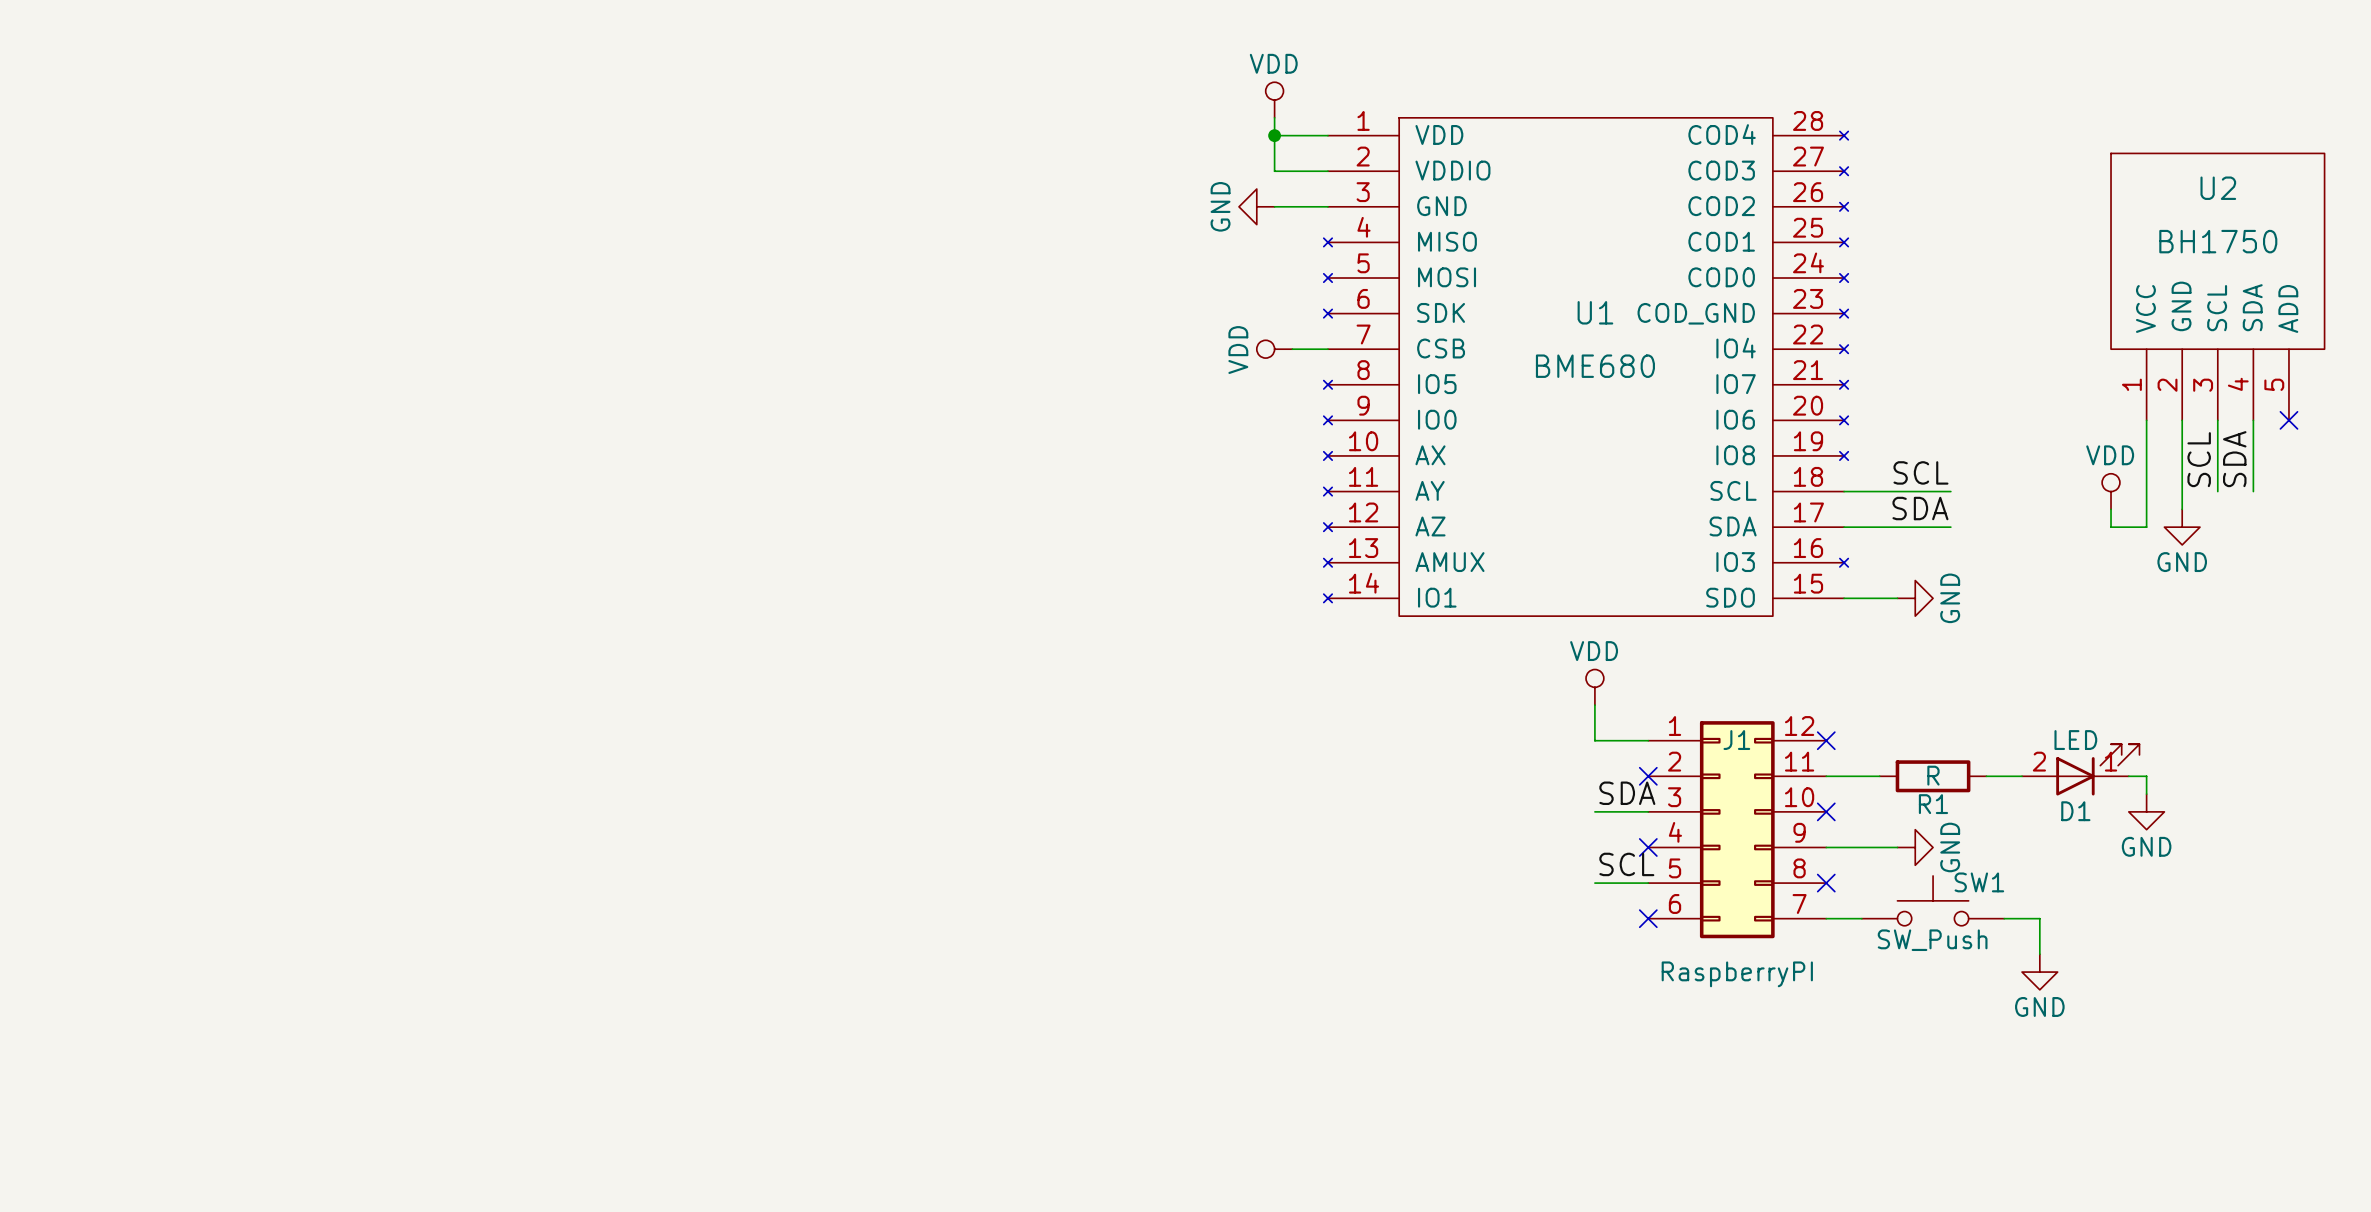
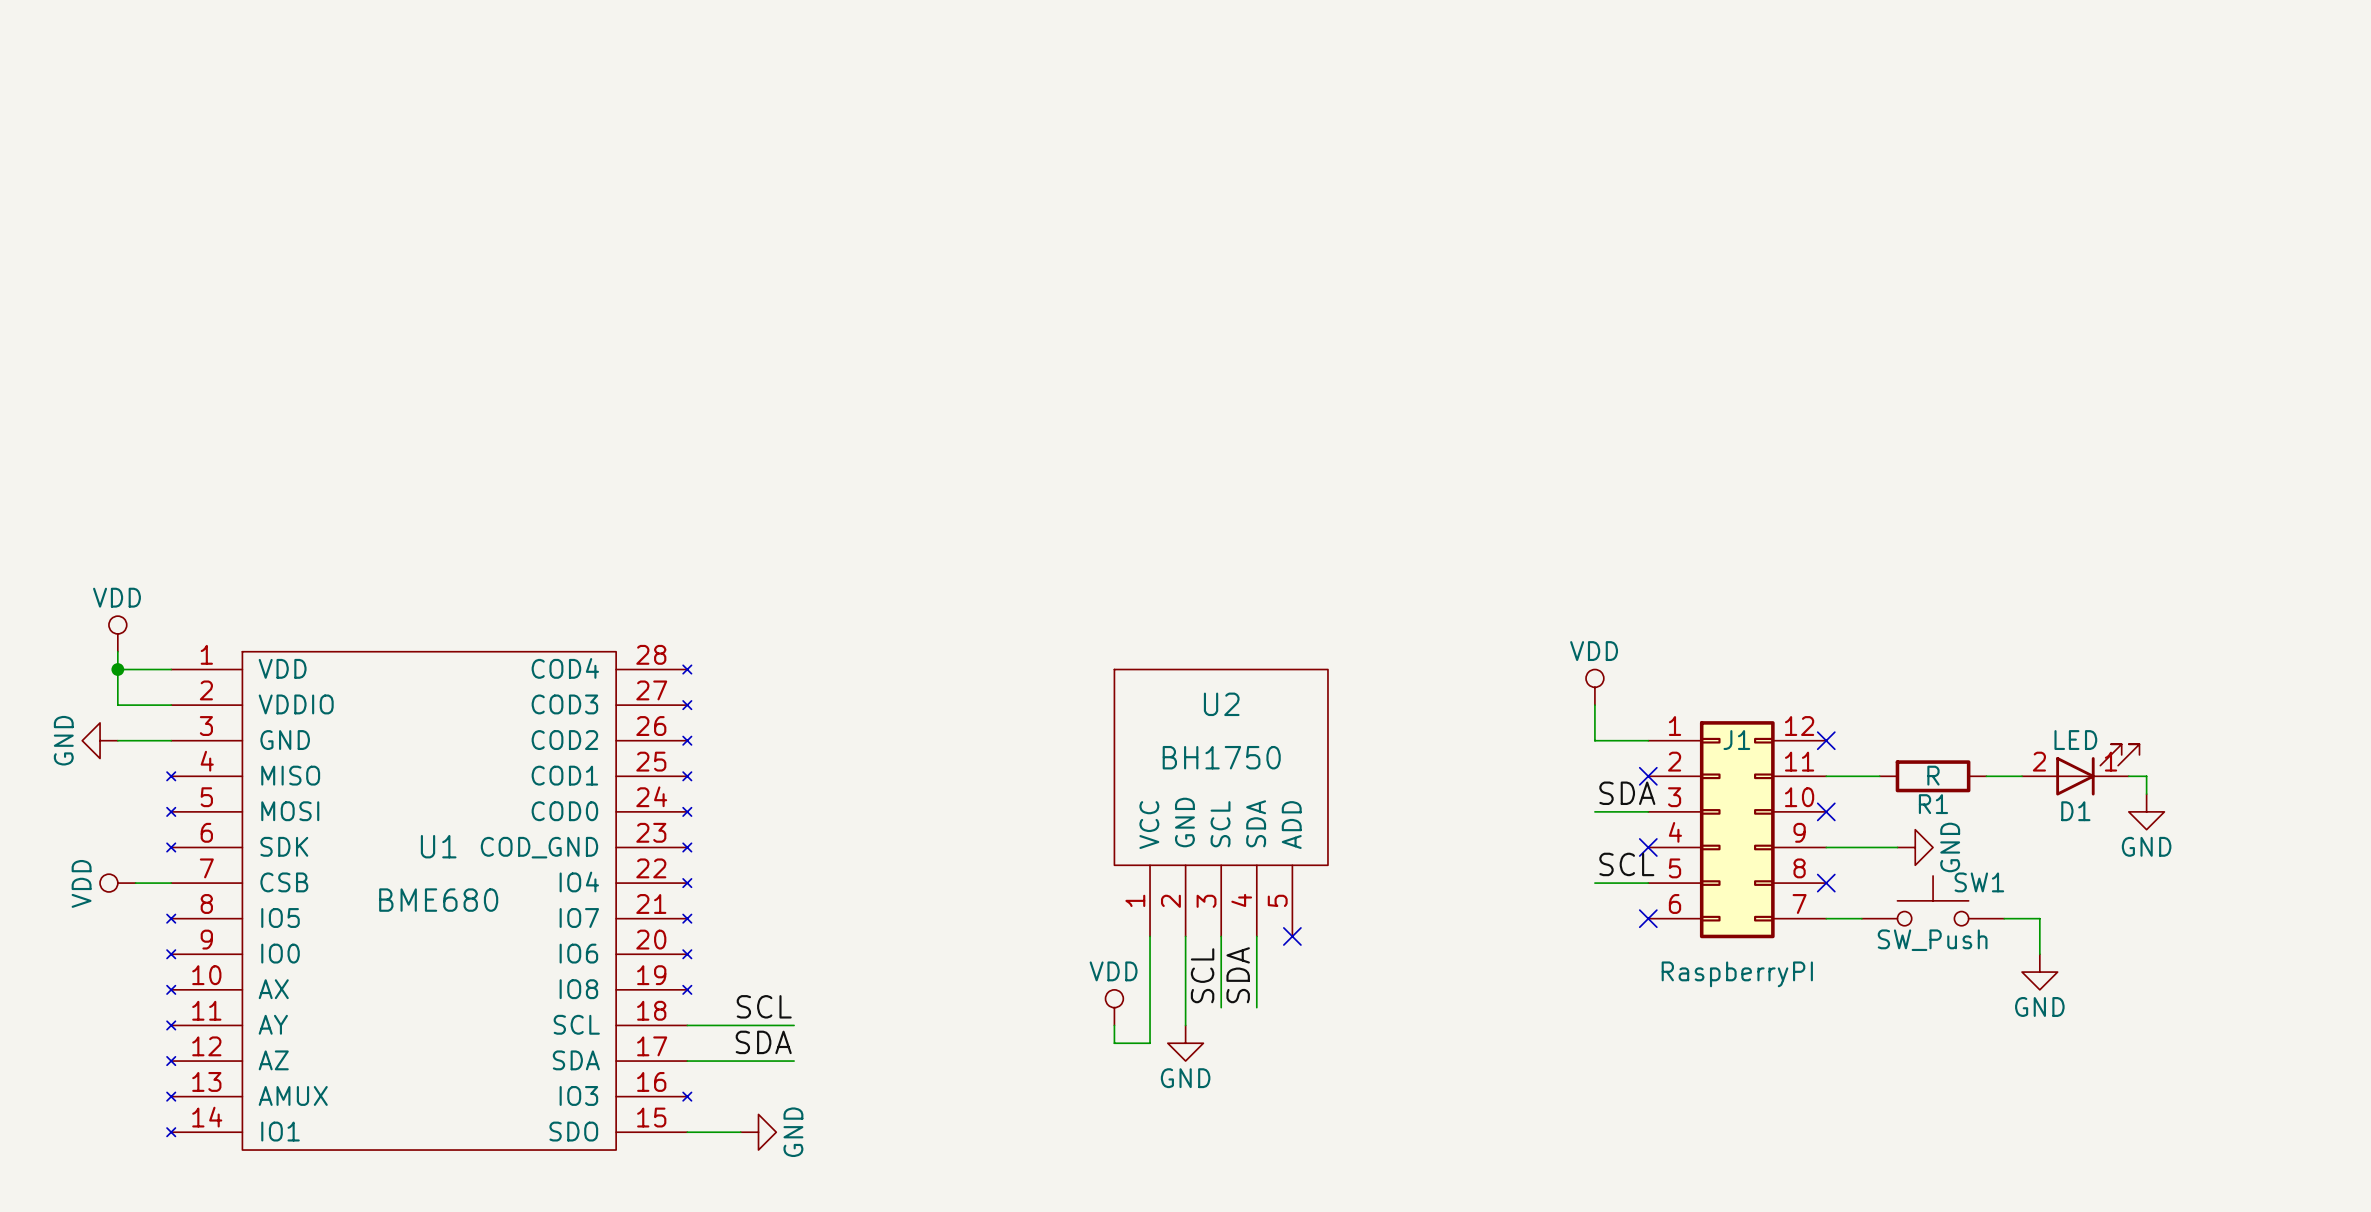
power symbol: VDD (1274, 100) -> none
wire: (1274, 117) (1274, 171) (1327, 171) -> none
wire: (1274, 135) (1327, 135) -> none
junction: (1274, 135) -> none
power symbol: GND (1256, 206) -> none
wire: (1274, 206) (1327, 206) -> none
U2 position: (2217, 286) -> (1221, 802)
power symbol: VDD (1274, 349) -> none
wire: (1292, 349) (1327, 349) -> none
U1 position: (1586, 366) -> (429, 900)
wire: (2146, 420) (2146, 527) (2111, 527) (2111, 509) -> none
wire: (2182, 420) (2182, 509) -> none
wire: (2217, 420) (2217, 491) -> none
wire: (2253, 420) (2253, 491) -> none
no-connect mark: (2288, 420) -> none
label: SCL (2199, 459) -> none
label: SDA (2234, 459) -> none
label: SCL (1920, 472) -> none
wire: (1844, 491) (1950, 491) -> none
power symbol: VDD (2111, 491) -> none
label: SDA (1920, 508) -> none
wire: (1844, 527) (1950, 527) -> none
power symbol: GND (2182, 527) -> none
wire: (1844, 598) (1897, 598) -> none
power symbol: GND (1915, 598) -> none
power symbol: none -> VDD (117, 633)
wire: none -> (117, 651) (117, 705) (171, 705)
wire: none -> (117, 669) (171, 669)
junction: none -> (117, 669)
power symbol: none -> GND (100, 740)
wire: none -> (117, 740) (171, 740)
power symbol: none -> VDD (117, 883)
wire: none -> (135, 883) (171, 883)
wire: none -> (1150, 936) (1150, 1043) (1114, 1043) (1114, 1025)
wire: none -> (1185, 936) (1185, 1025)
wire: none -> (1221, 936) (1221, 1007)
wire: none -> (1256, 936) (1256, 1007)
no-connect mark: none -> (1292, 936)
label: none -> SCL (1202, 975)
label: none -> SDA (1238, 975)
label: none -> SCL (764, 1006)
power symbol: none -> VDD (1114, 1007)
wire: none -> (687, 1025) (794, 1025)
label: none -> SDA (763, 1042)
power symbol: none -> GND (1185, 1043)
wire: none -> (687, 1061) (794, 1061)
wire: none -> (687, 1132) (740, 1132)
power symbol: none -> GND (758, 1132)

